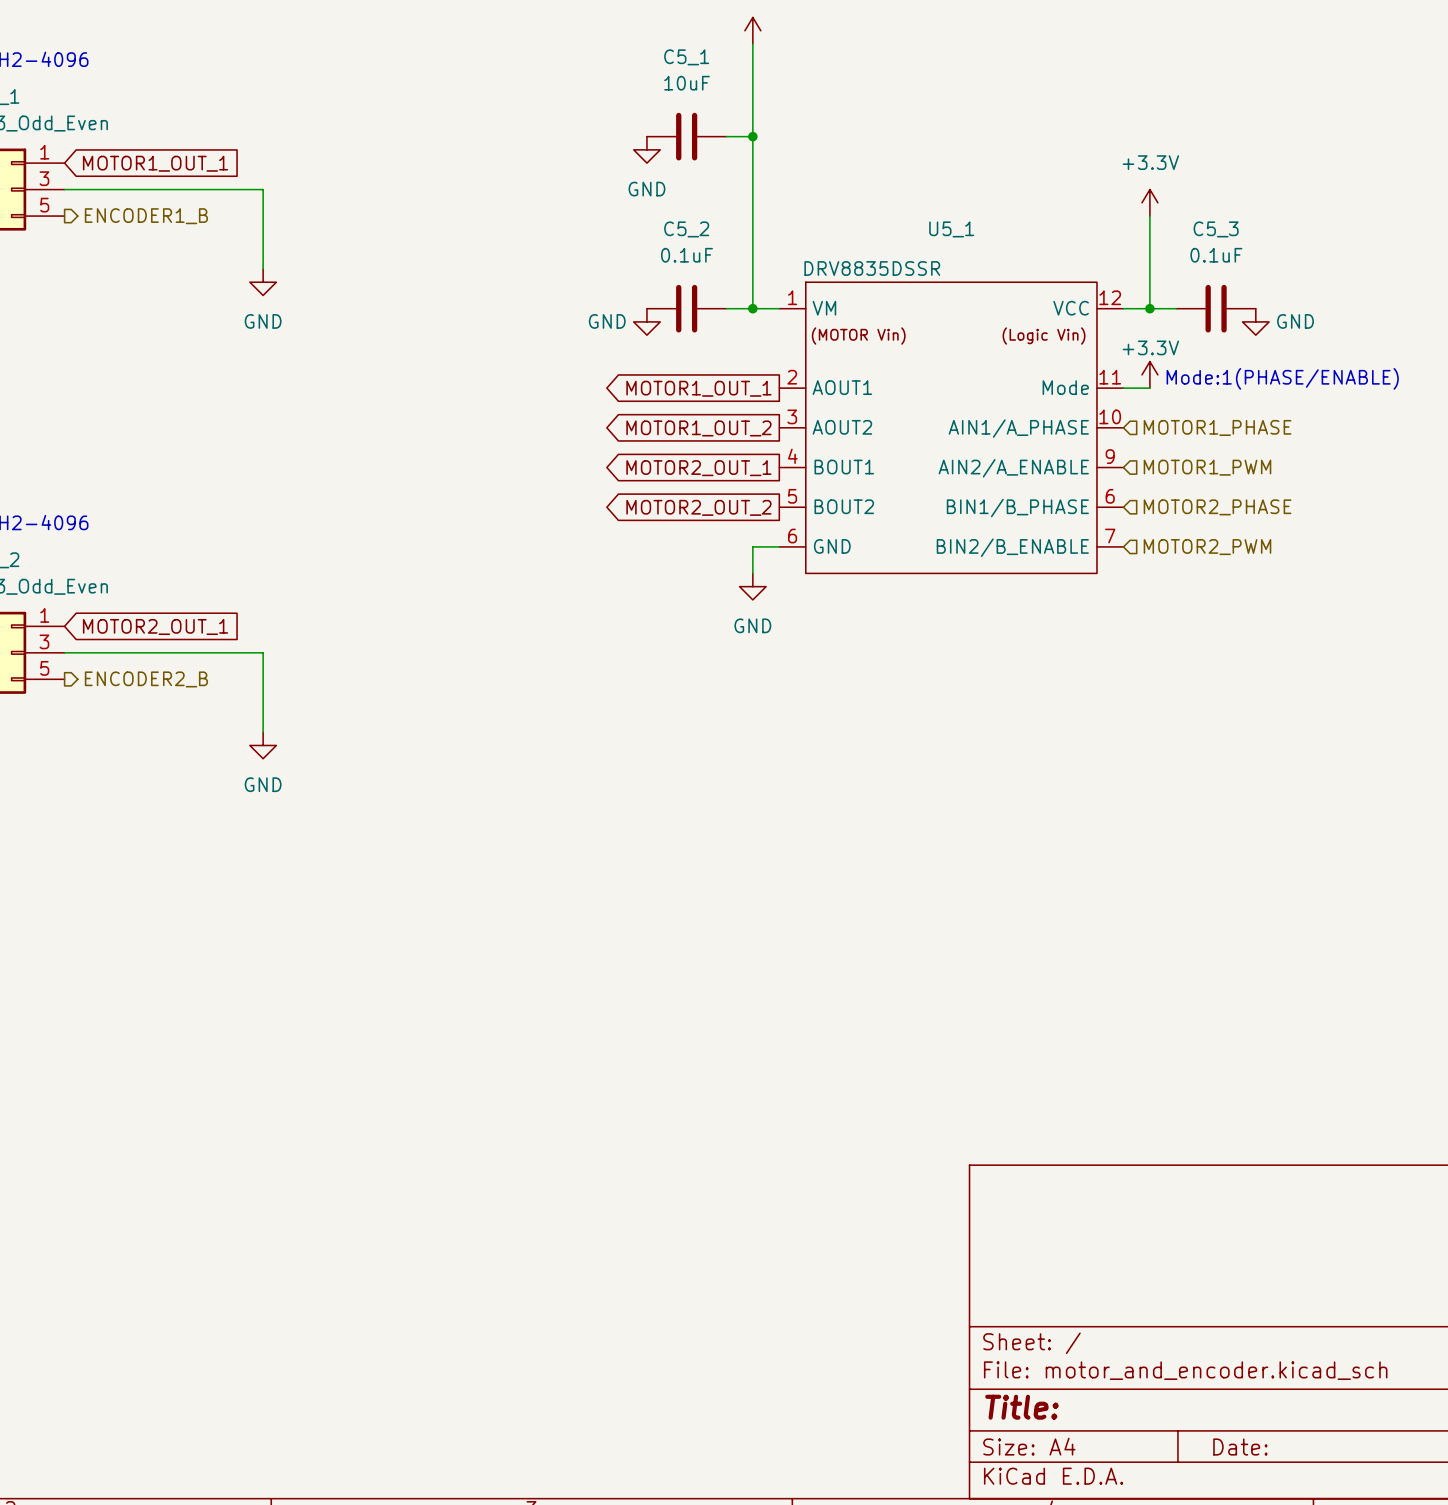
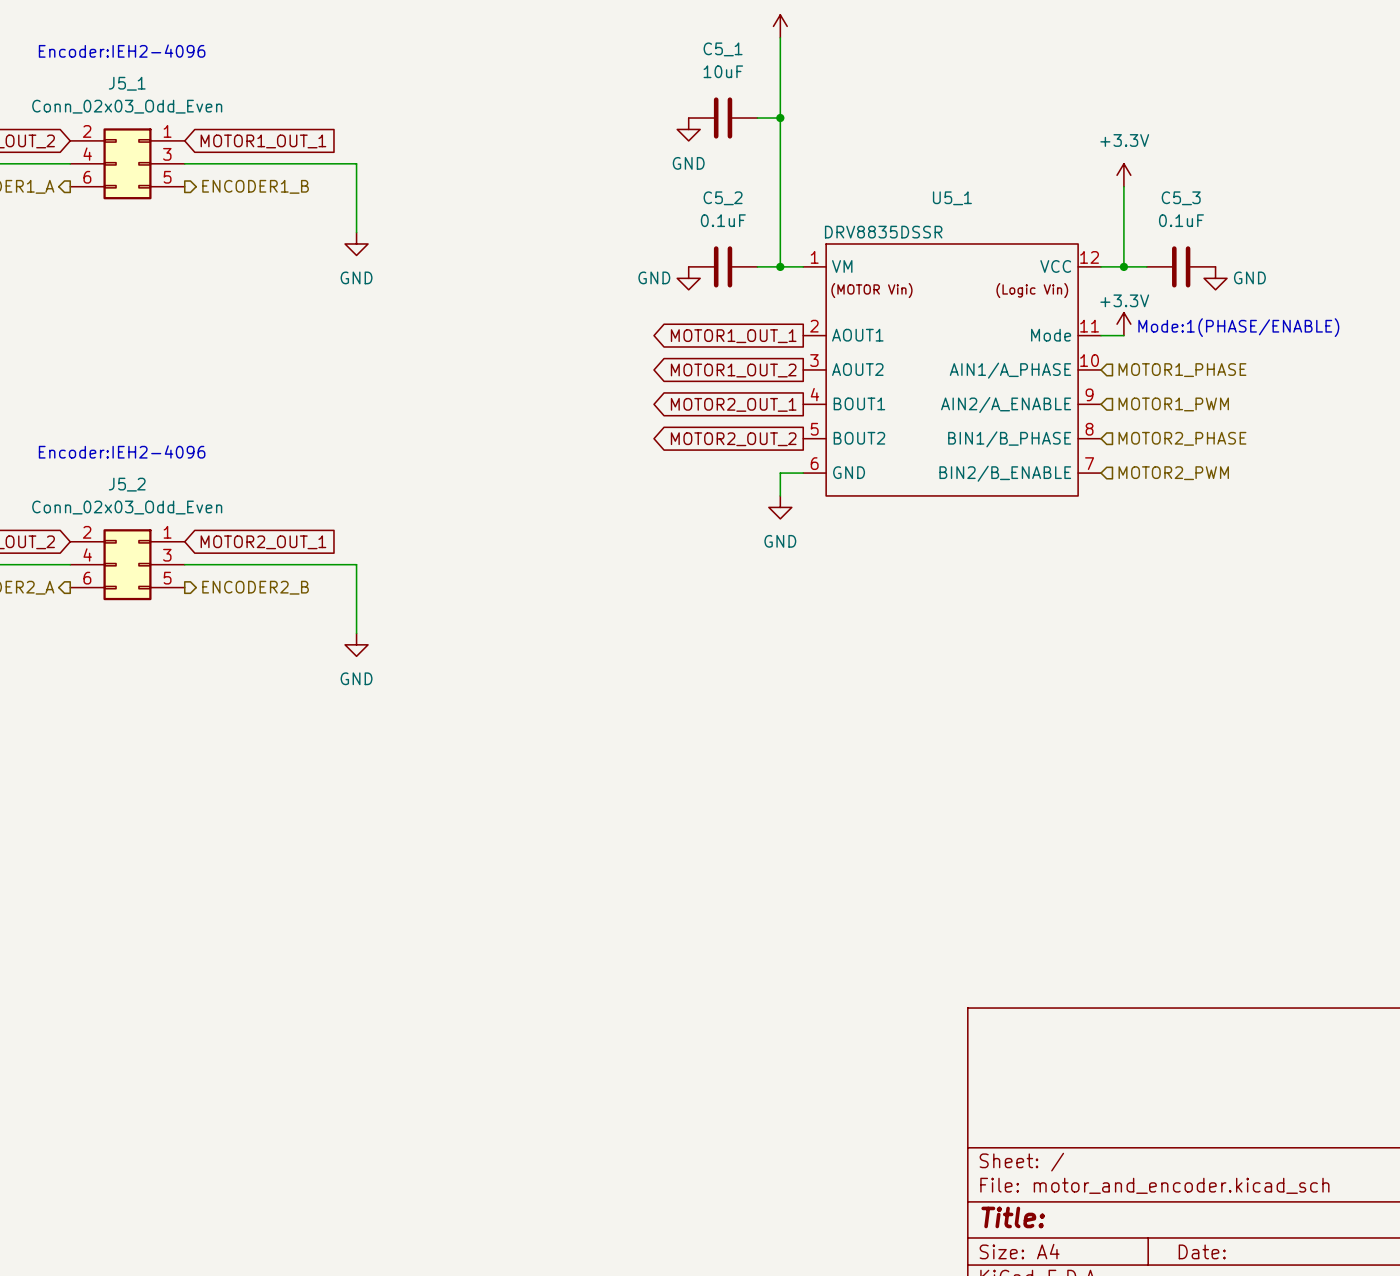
U5_1 pin number: 6 (1110, 496) -> 8 (1089, 429)

